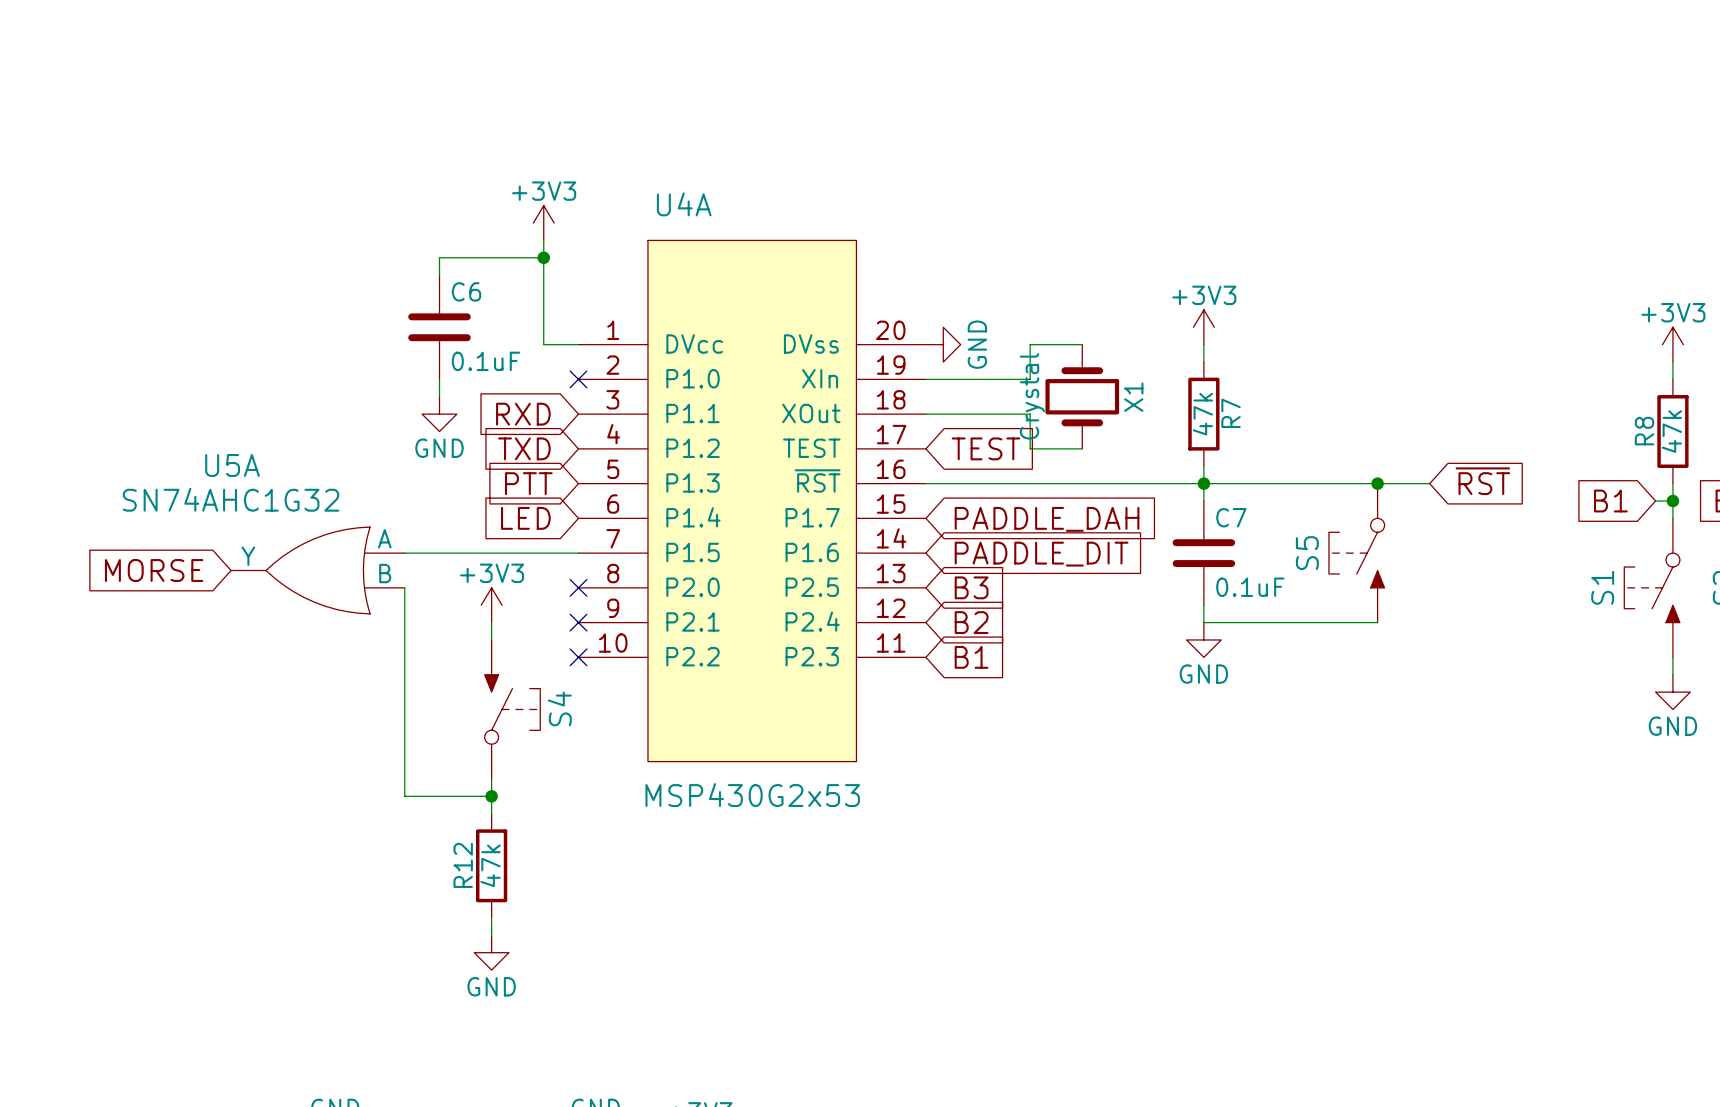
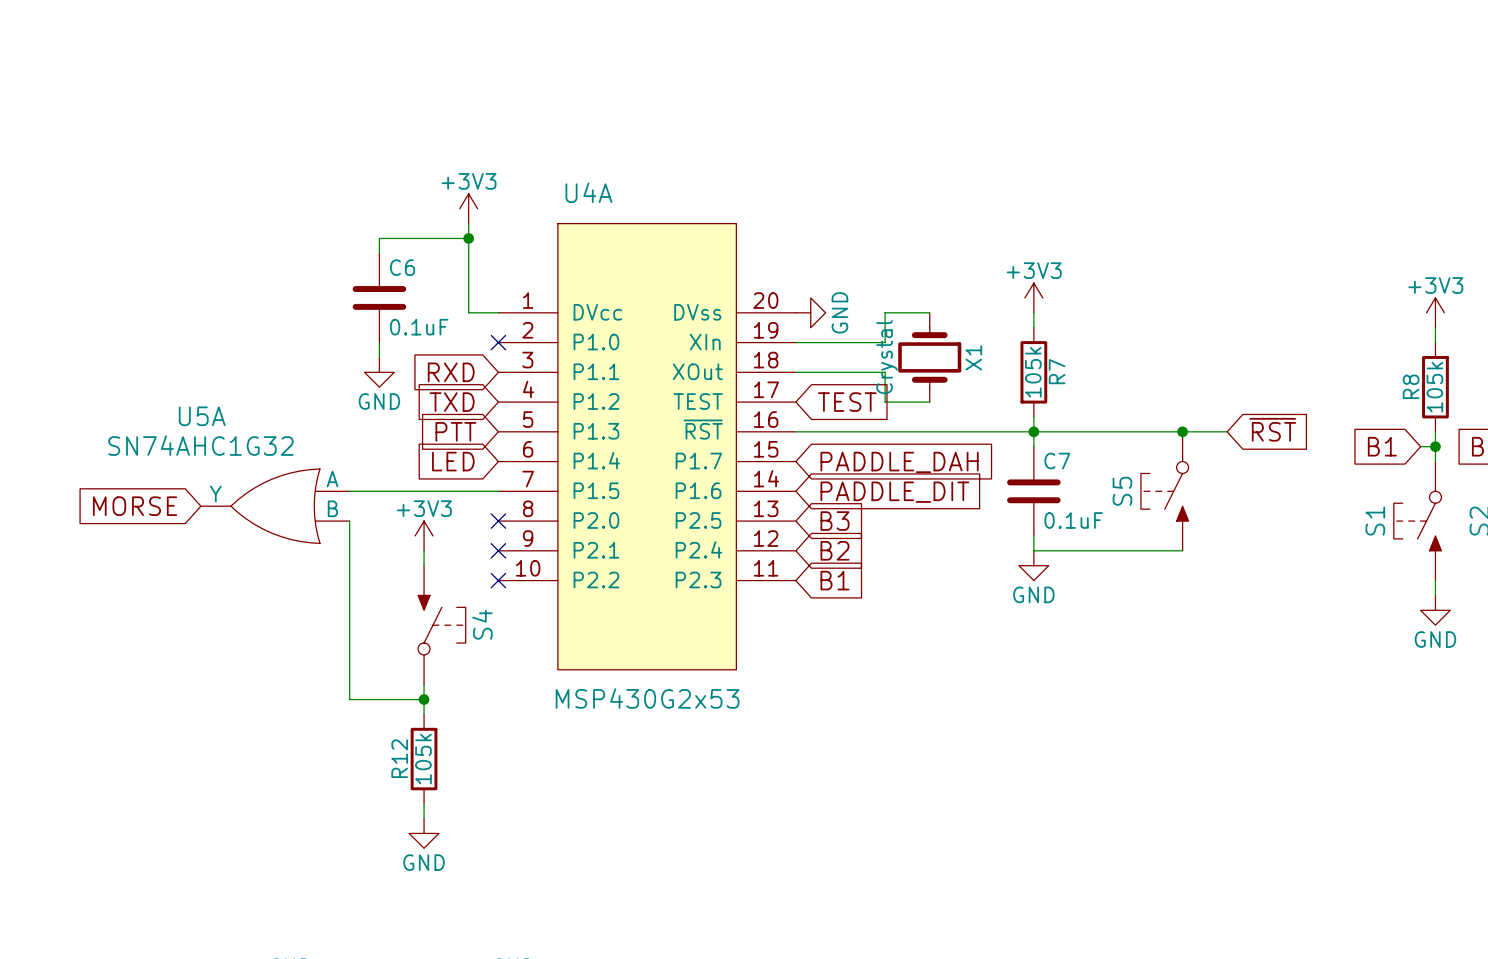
R7 value: 47k (1202, 414) -> 105k (1033, 372)
R8 value: 47k (1671, 431) -> 105k (1434, 387)
R12 value: 47k (490, 865) -> 105k (423, 759)

